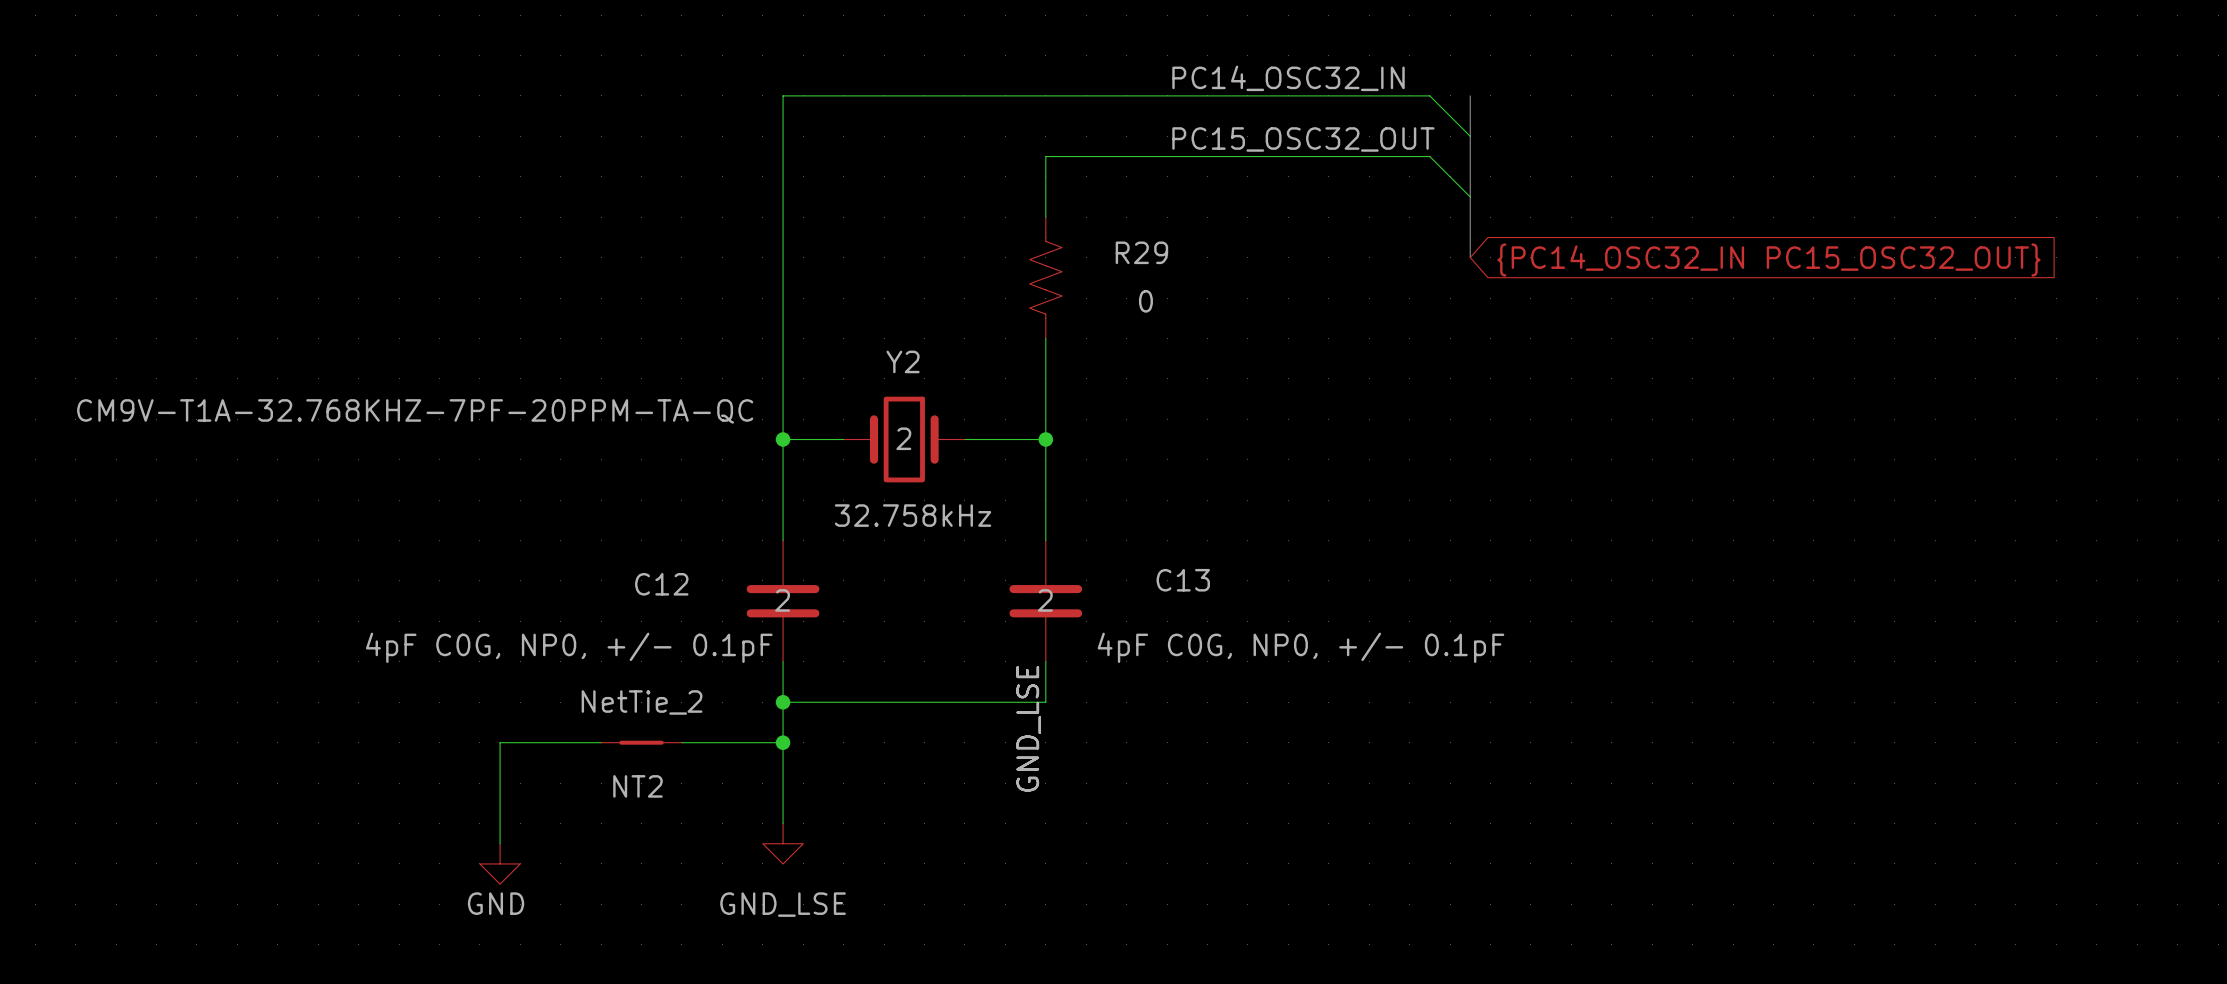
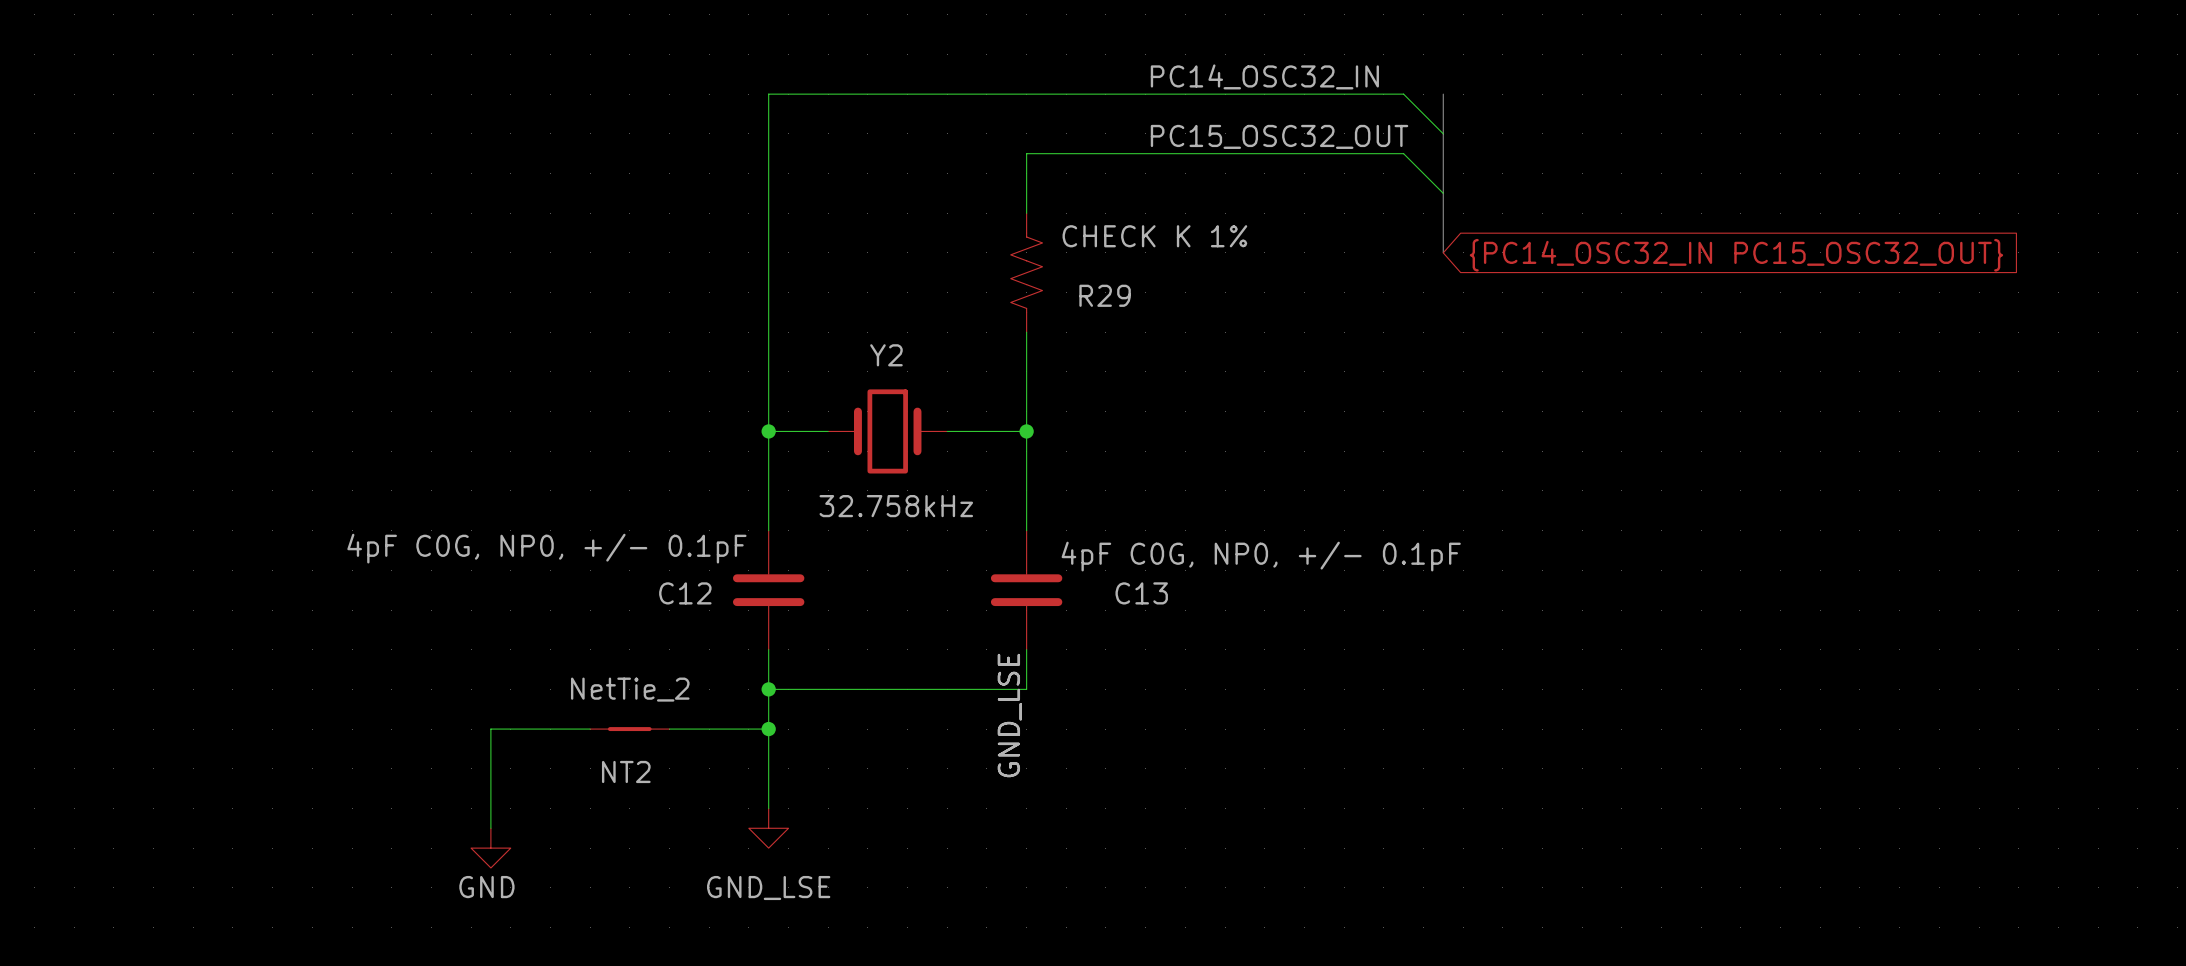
R29 name position: R29 (1141, 252) -> R29 (1105, 295)
R29 value: 0 (1145, 301) -> CHECK K 1% (1154, 236)
Y2 text: CM9V-T1A-32.768KHZ-7PF-20PPM-TA-QC (415, 411) -> none
Y2 text: 2 (903, 438) -> none
C13 name position: C13 (1183, 580) -> C13 (1141, 593)
C12 name position: C12 (661, 584) -> C12 (685, 593)
C12 text: 2 (782, 600) -> none
C13 text: 2 (1045, 600) -> none
C12 value position: 4pF C0G, NP0, +/- 0.1pF (569, 647) -> 4pF C0G, NP0, +/- 0.1pF (546, 548)
C13 value position: 4pF C0G, NP0, +/- 0.1pF (1300, 647) -> 4pF C0G, NP0, +/- 0.1pF (1261, 556)

